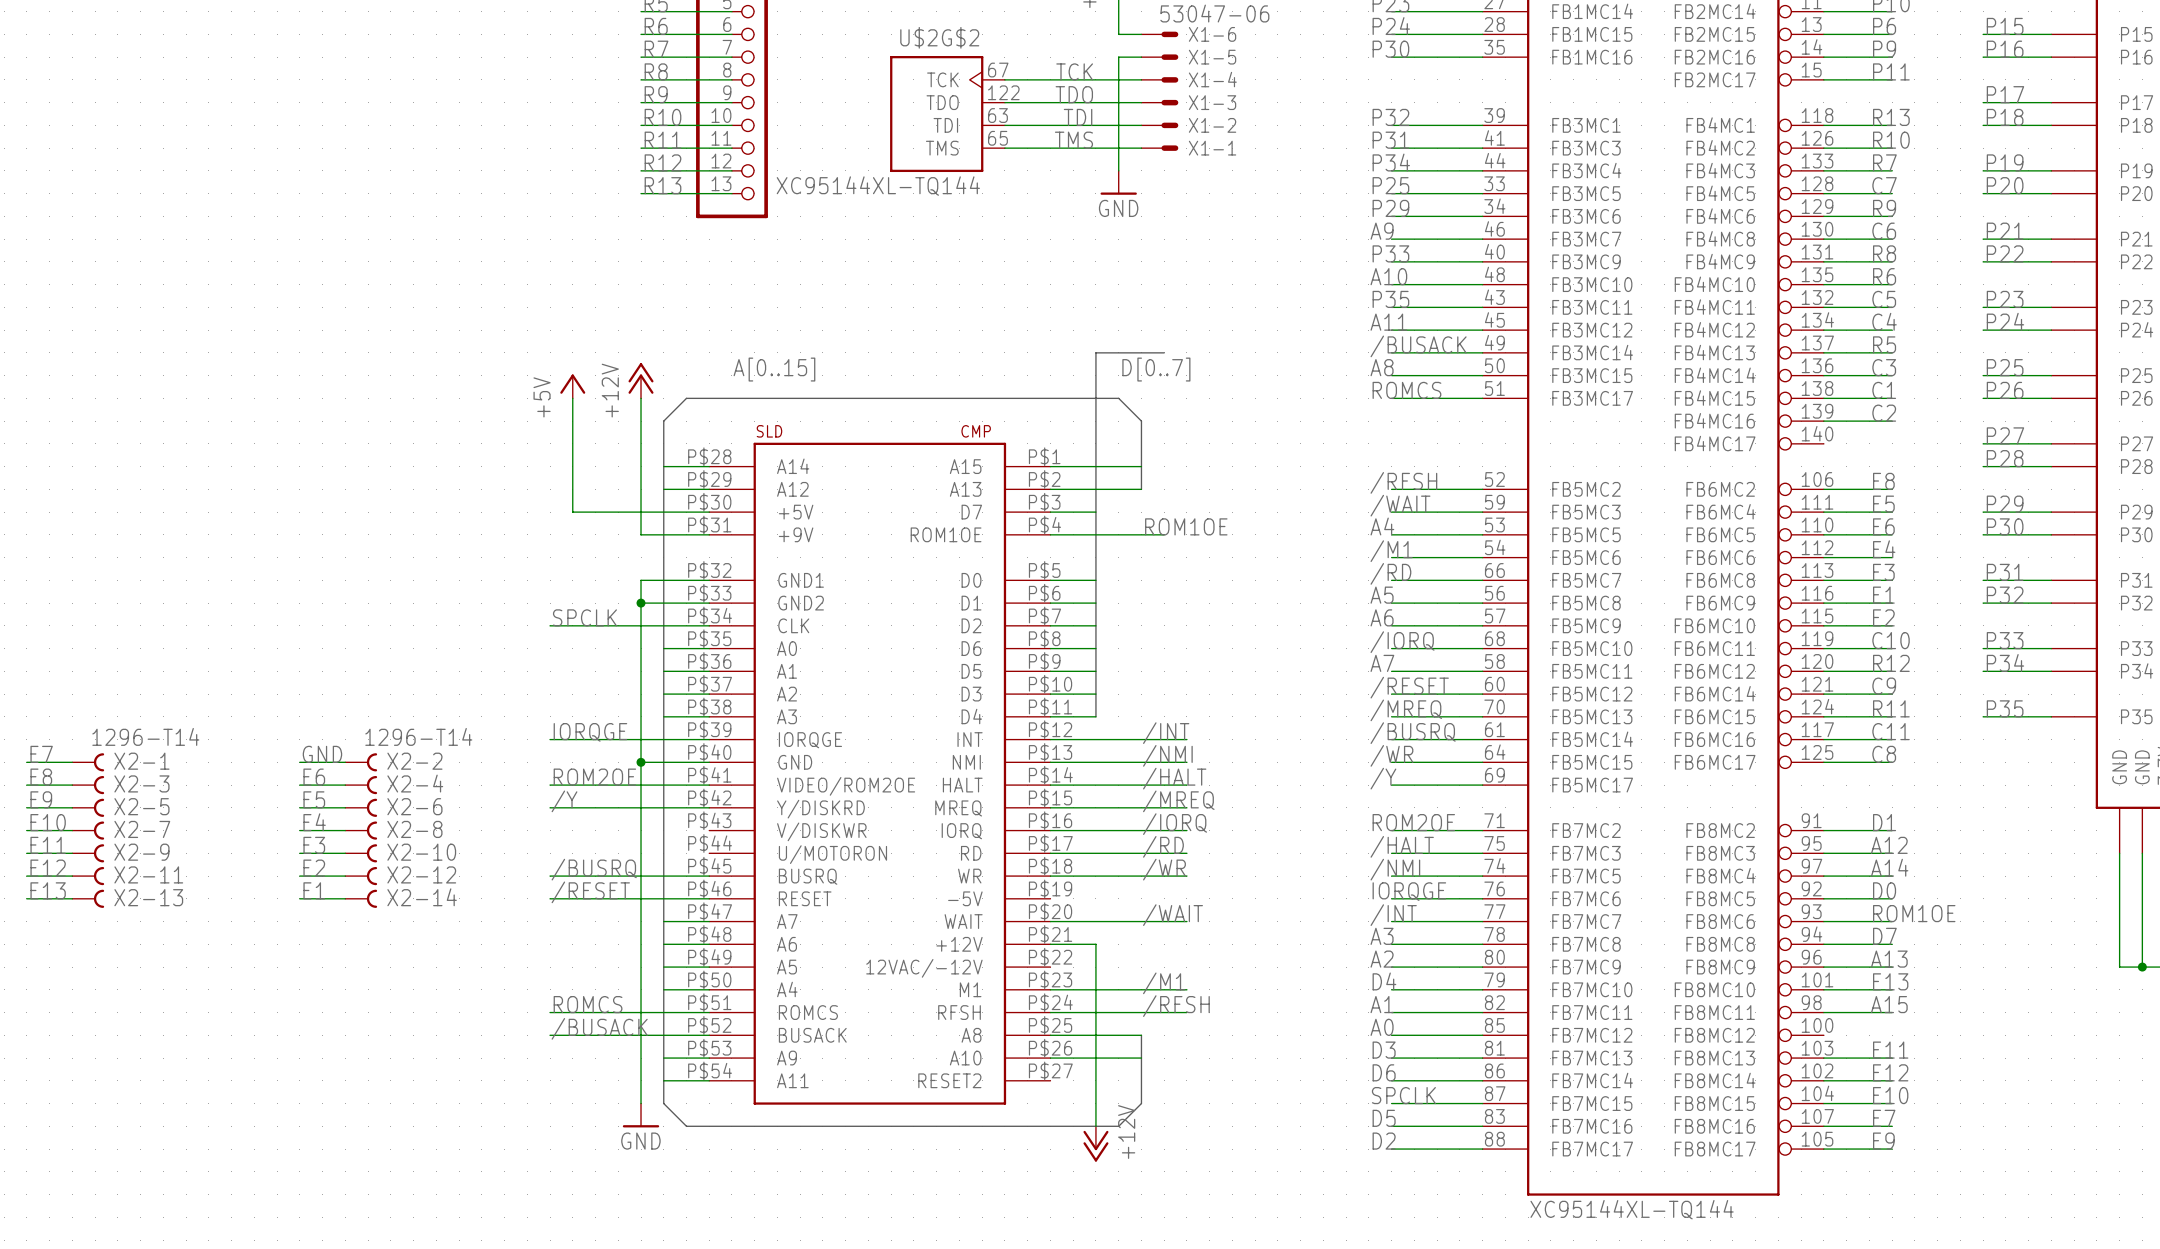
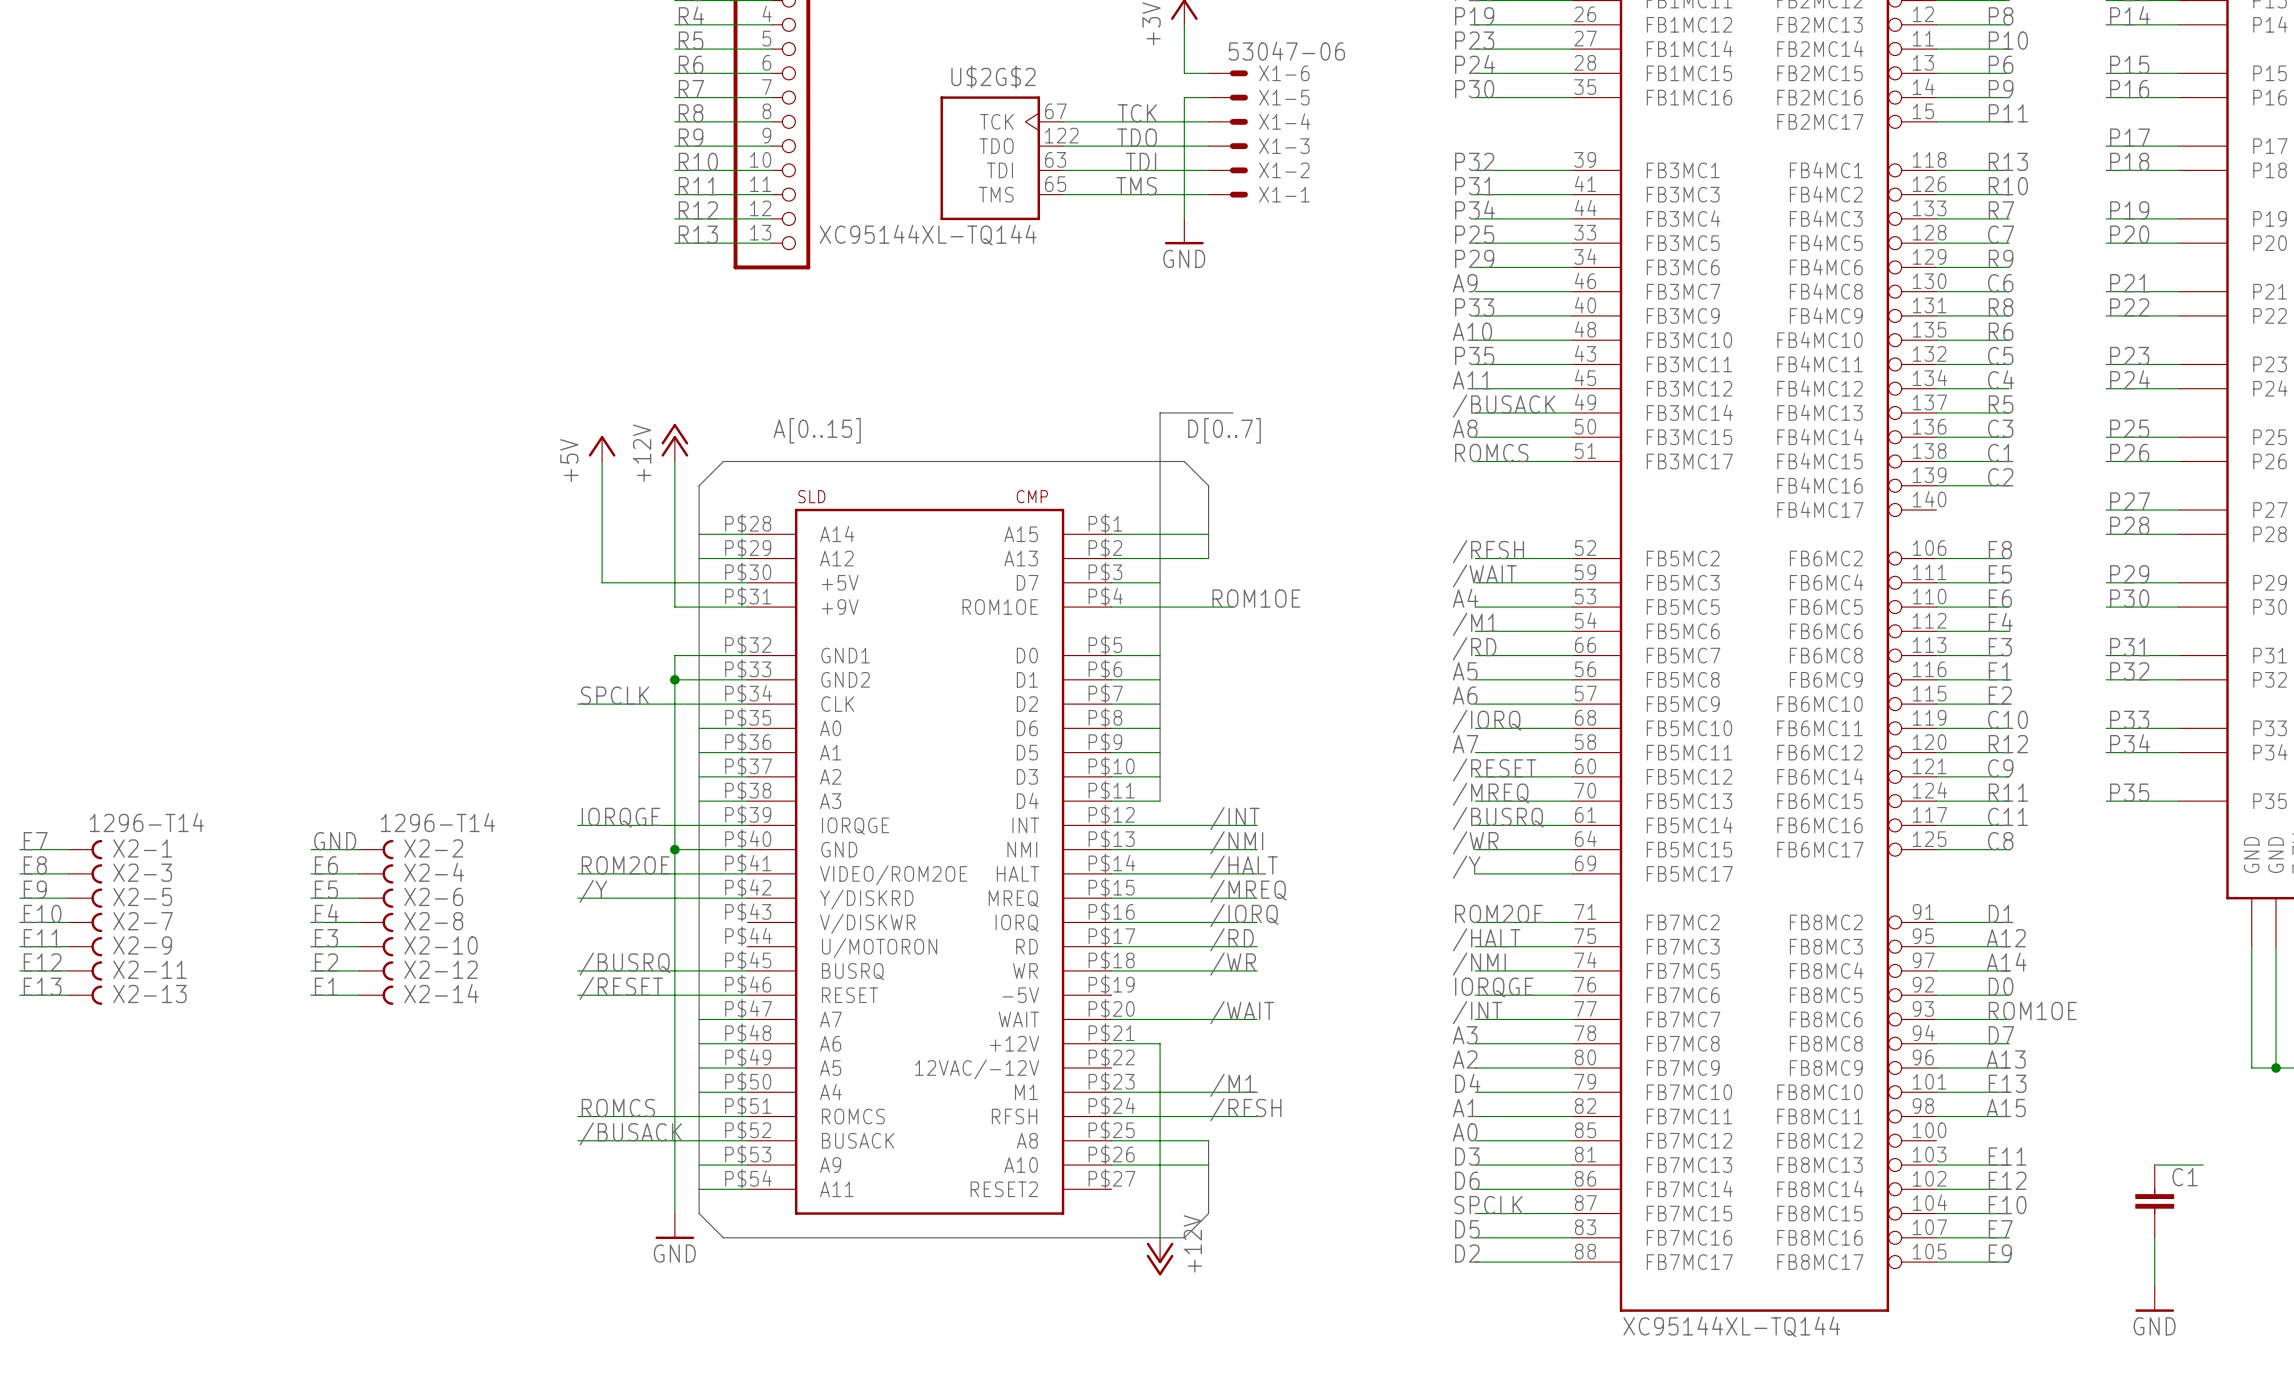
wire: none -> (2154, 1165) (2203, 1165)
C1: none -> (2154, 1201)
wire: none -> (2154, 1237) (2154, 1286)
power symbol: none -> GND (2154, 1299)

